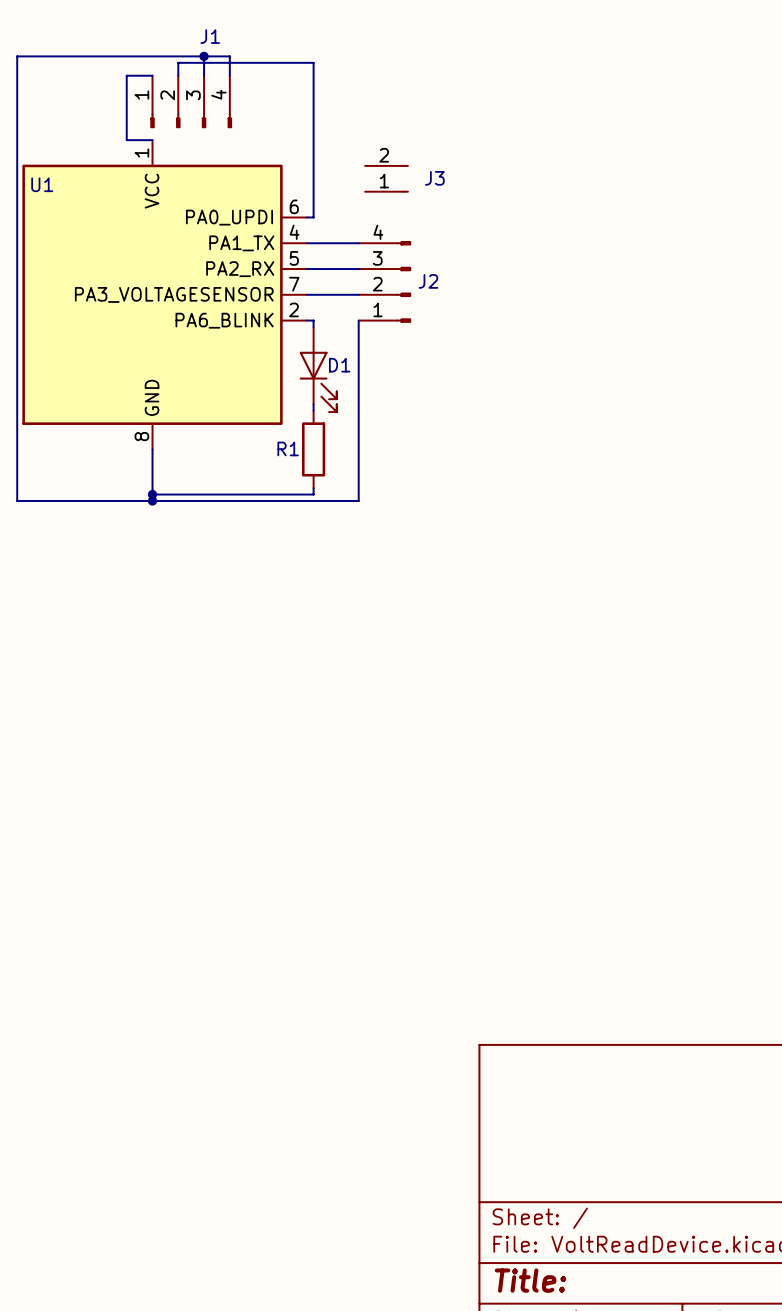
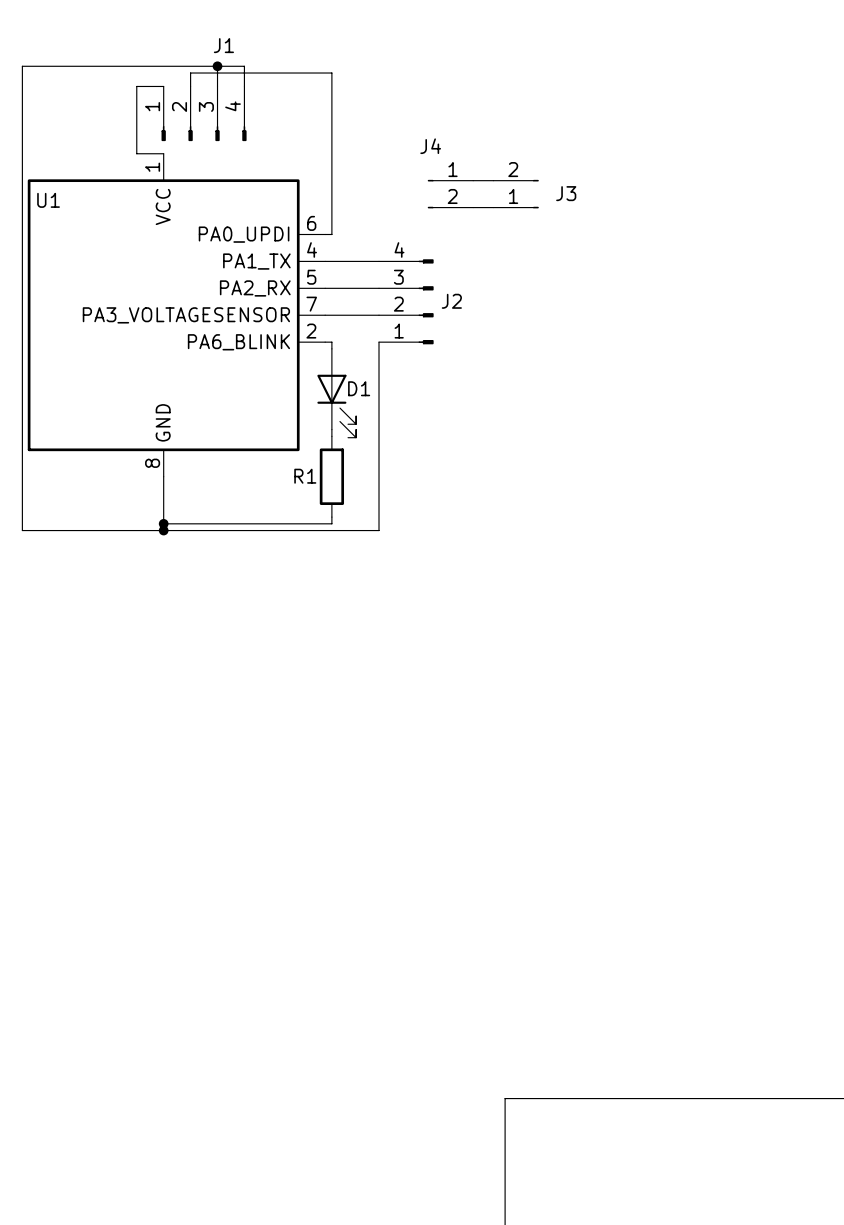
wire: none -> (473, 180) (493, 180)
J3 position: (386, 178) -> (516, 194)
J4: none -> (450, 194)
wire: none -> (473, 207) (493, 207)

